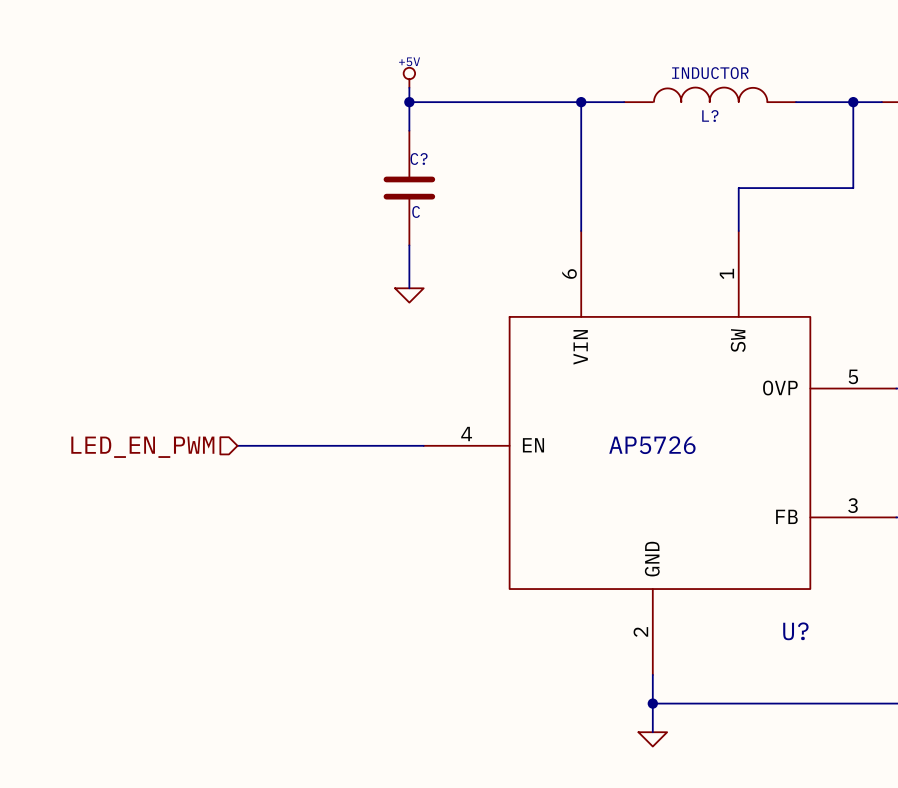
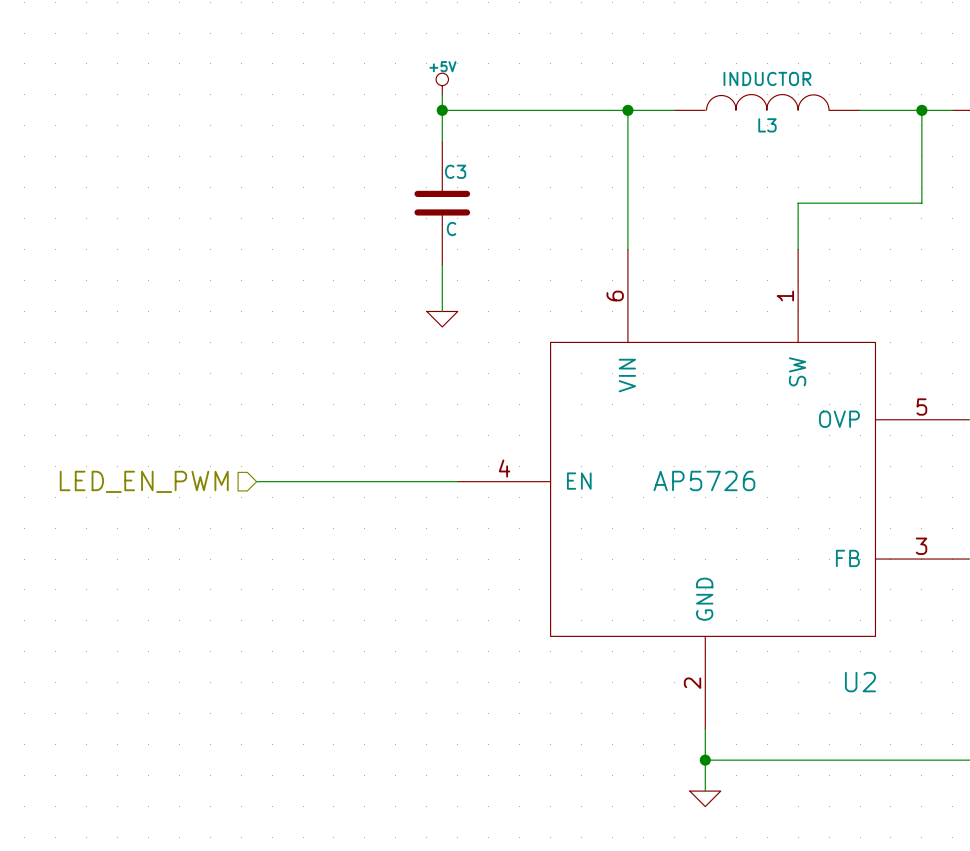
L? name: L? (710, 116) -> L3 (767, 125)
C? name: C? (419, 158) -> C3 (455, 171)
U? name: U? (795, 631) -> U2 (860, 682)

